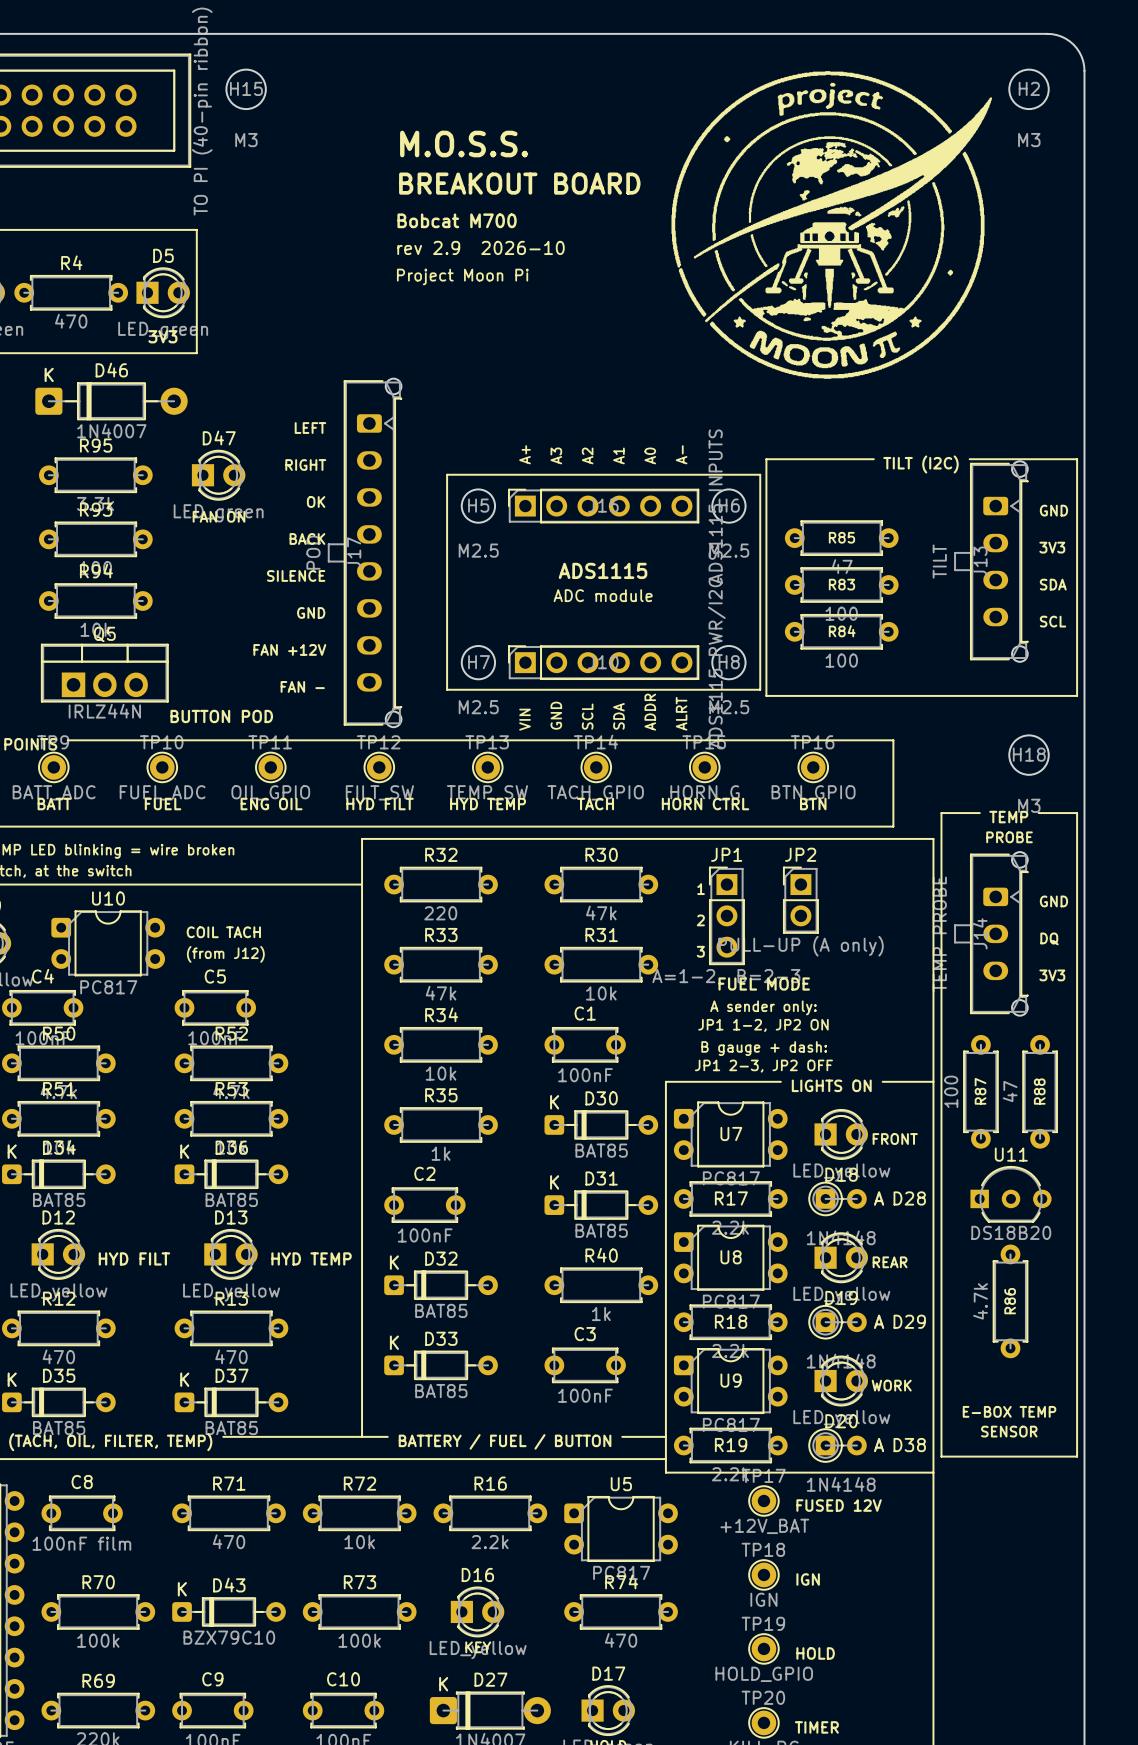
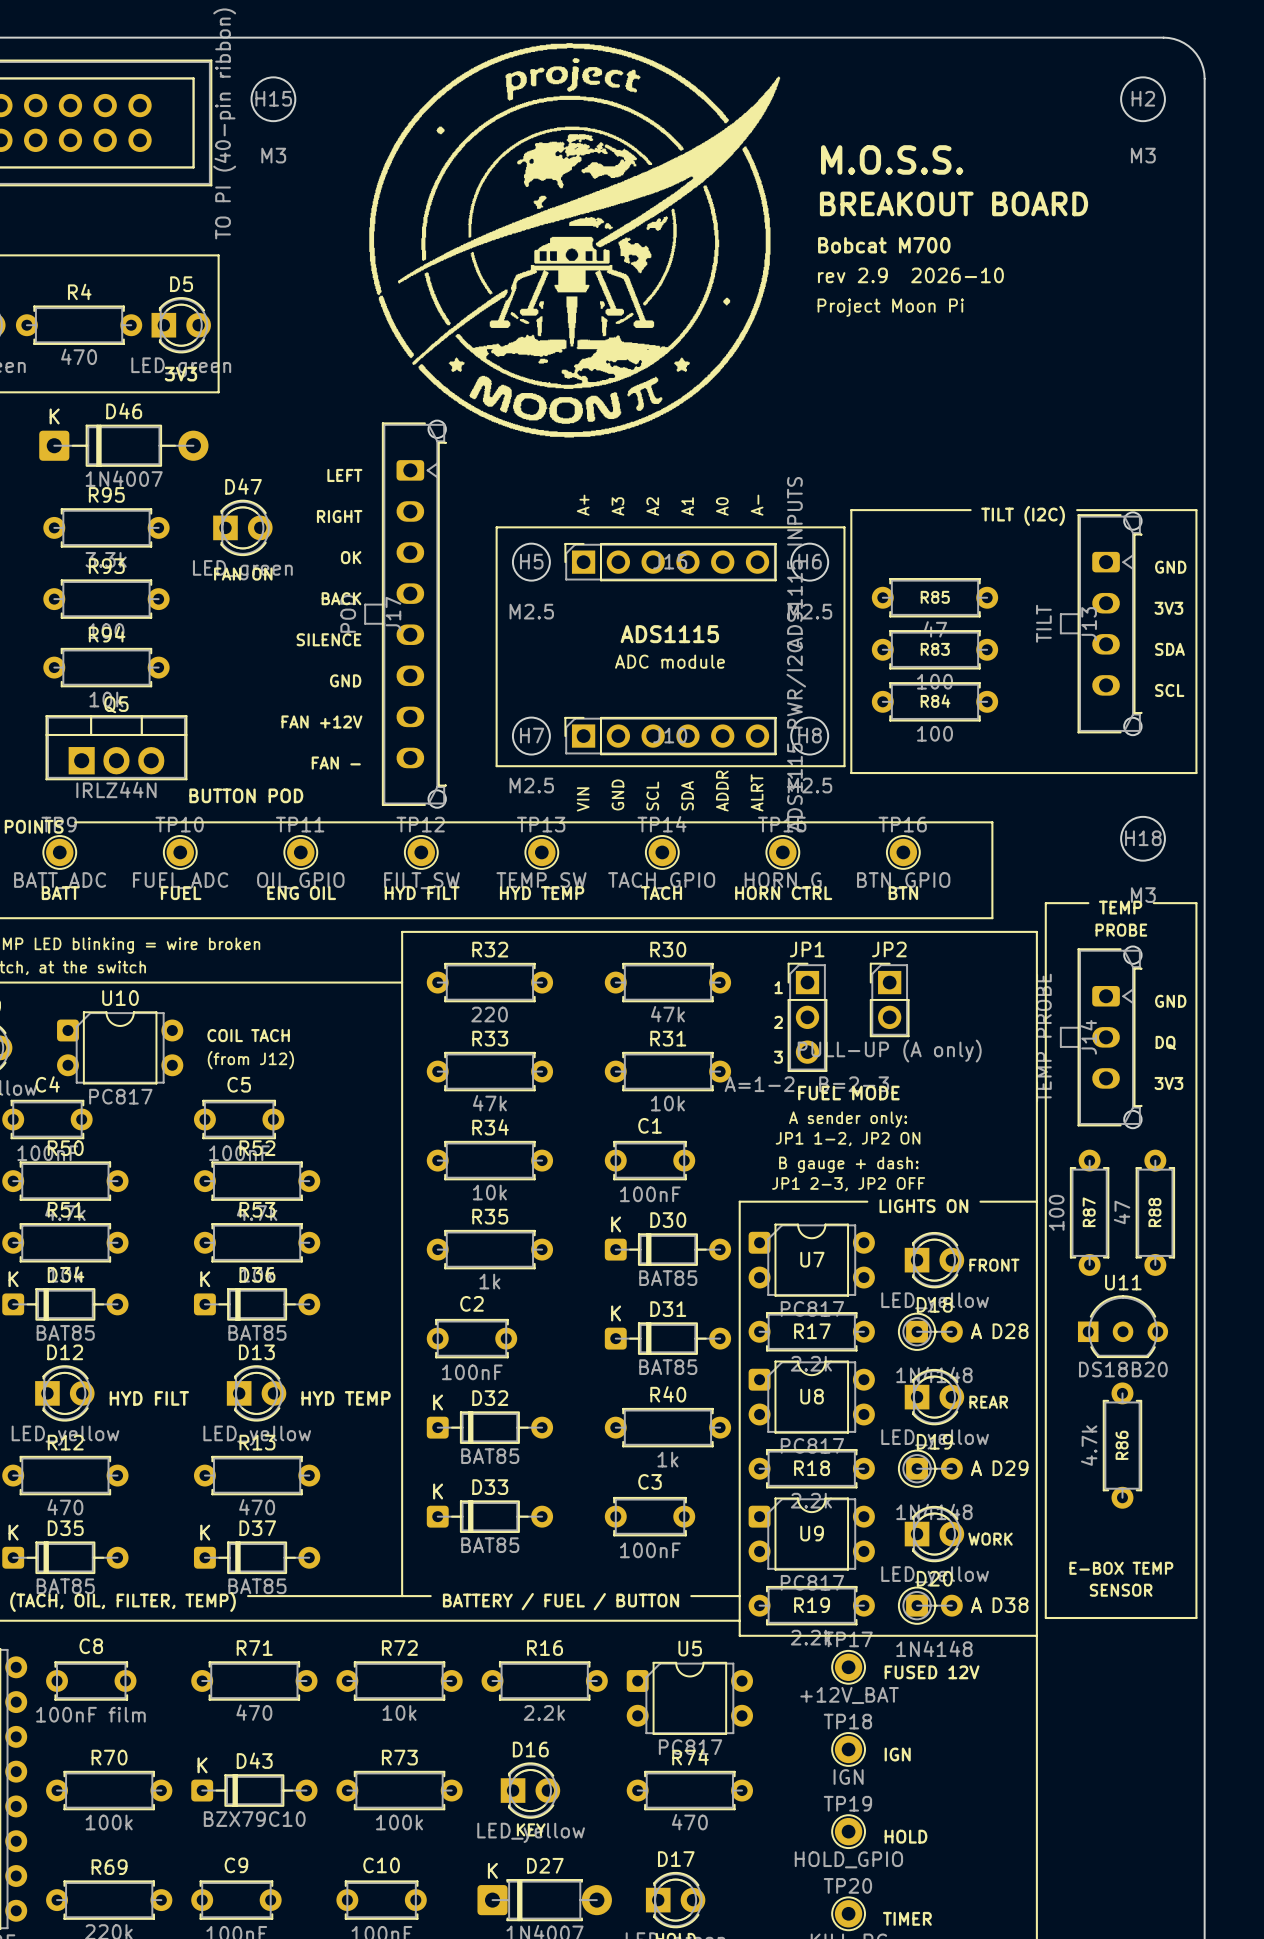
drawing: none -> [369, 43, 781, 438]
drawing: [671, 71, 993, 379] -> none
text: M.O.S.S. (464, 144) -> none
text: none -> M.O.S.S. (892, 159)
text: BREAKOUT BOARD (519, 183) -> none
text: none -> BREAKOUT BOARD (954, 203)
text: Bobcat M700 (457, 220) -> none
text: none -> Bobcat M700 (884, 245)
text: rev 2.9 2026-10 (481, 247) -> none
text: none -> rev 2.9 2026-10 (910, 275)
text: Project Moon Pi (462, 276) -> none
text: none -> Project Moon Pi (890, 307)

